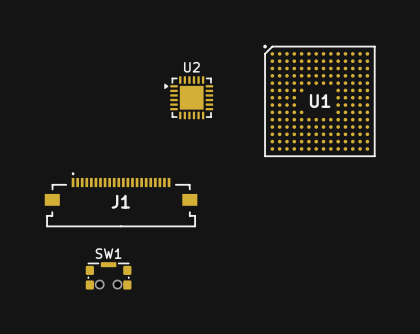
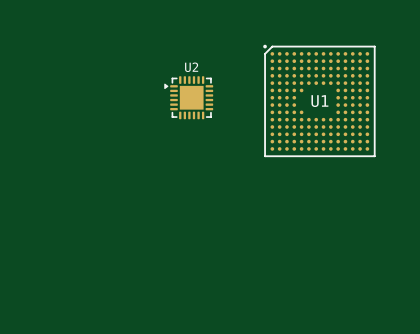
J1: (121, 200) -> none
SW1: (108, 275) -> none

